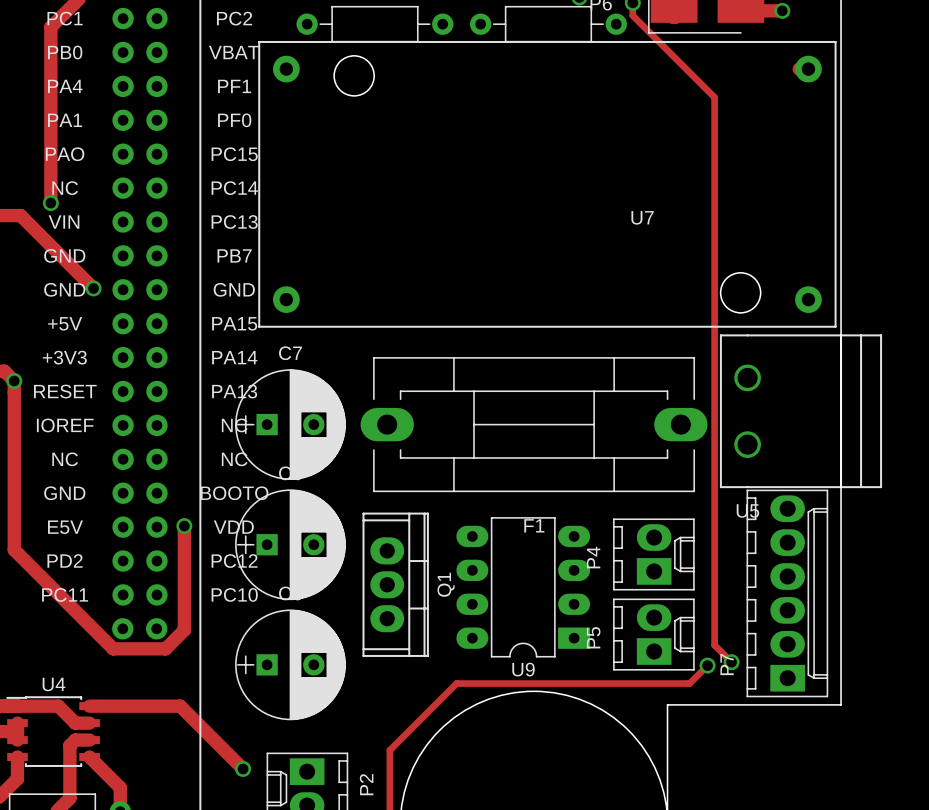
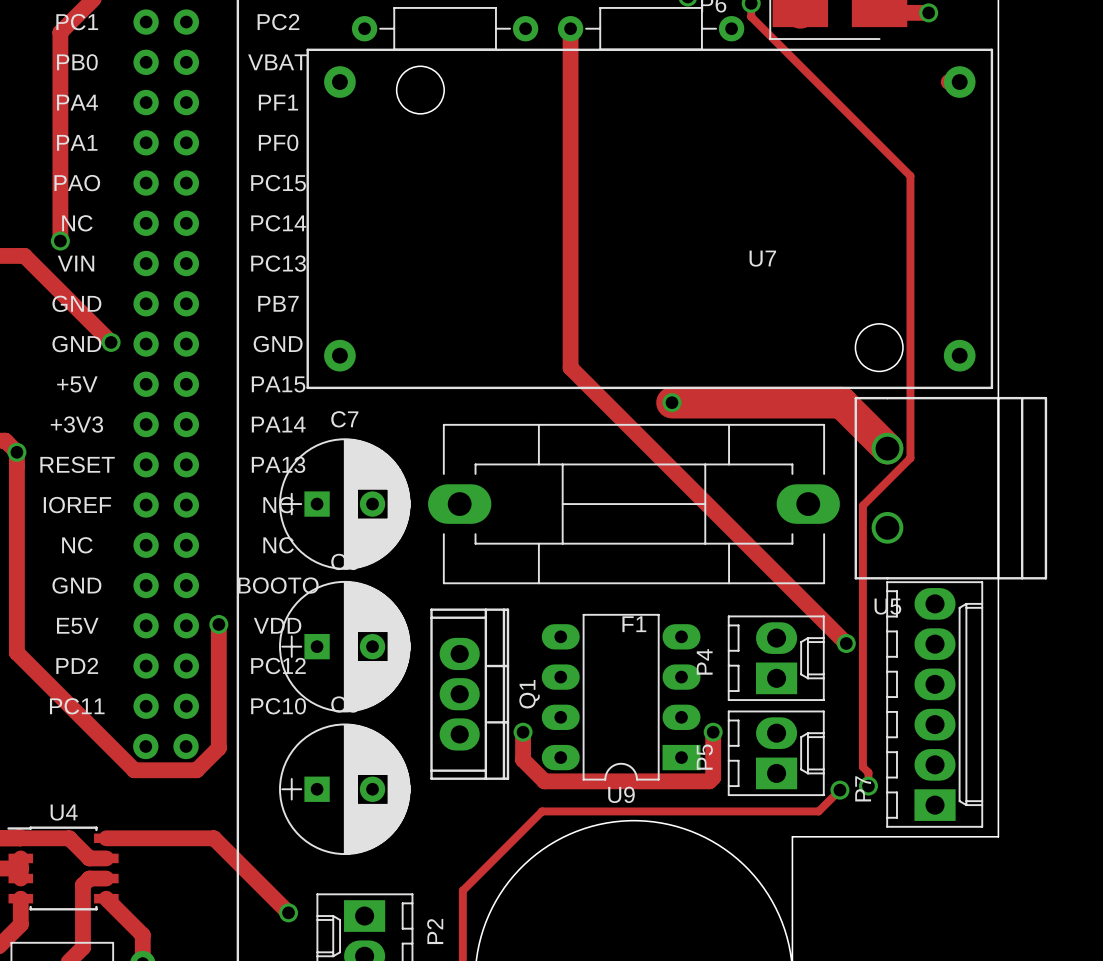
track: (632, 14) (714, 97) (714, 645) (731, 662) -> (751, 16) (910, 176) (910, 458) (862, 505) (862, 767) (868, 772) (868, 786)
track: none -> (570, 28) (570, 367) (846, 643)
track: none -> (672, 402) (841, 402) (887, 448)
via: none -> (672, 402)
via: none -> (846, 643)
track: none -> (523, 732) (523, 759) (544, 781) (709, 781) (713, 777) (713, 732)
via: none -> (523, 732)
via: none -> (713, 732)

